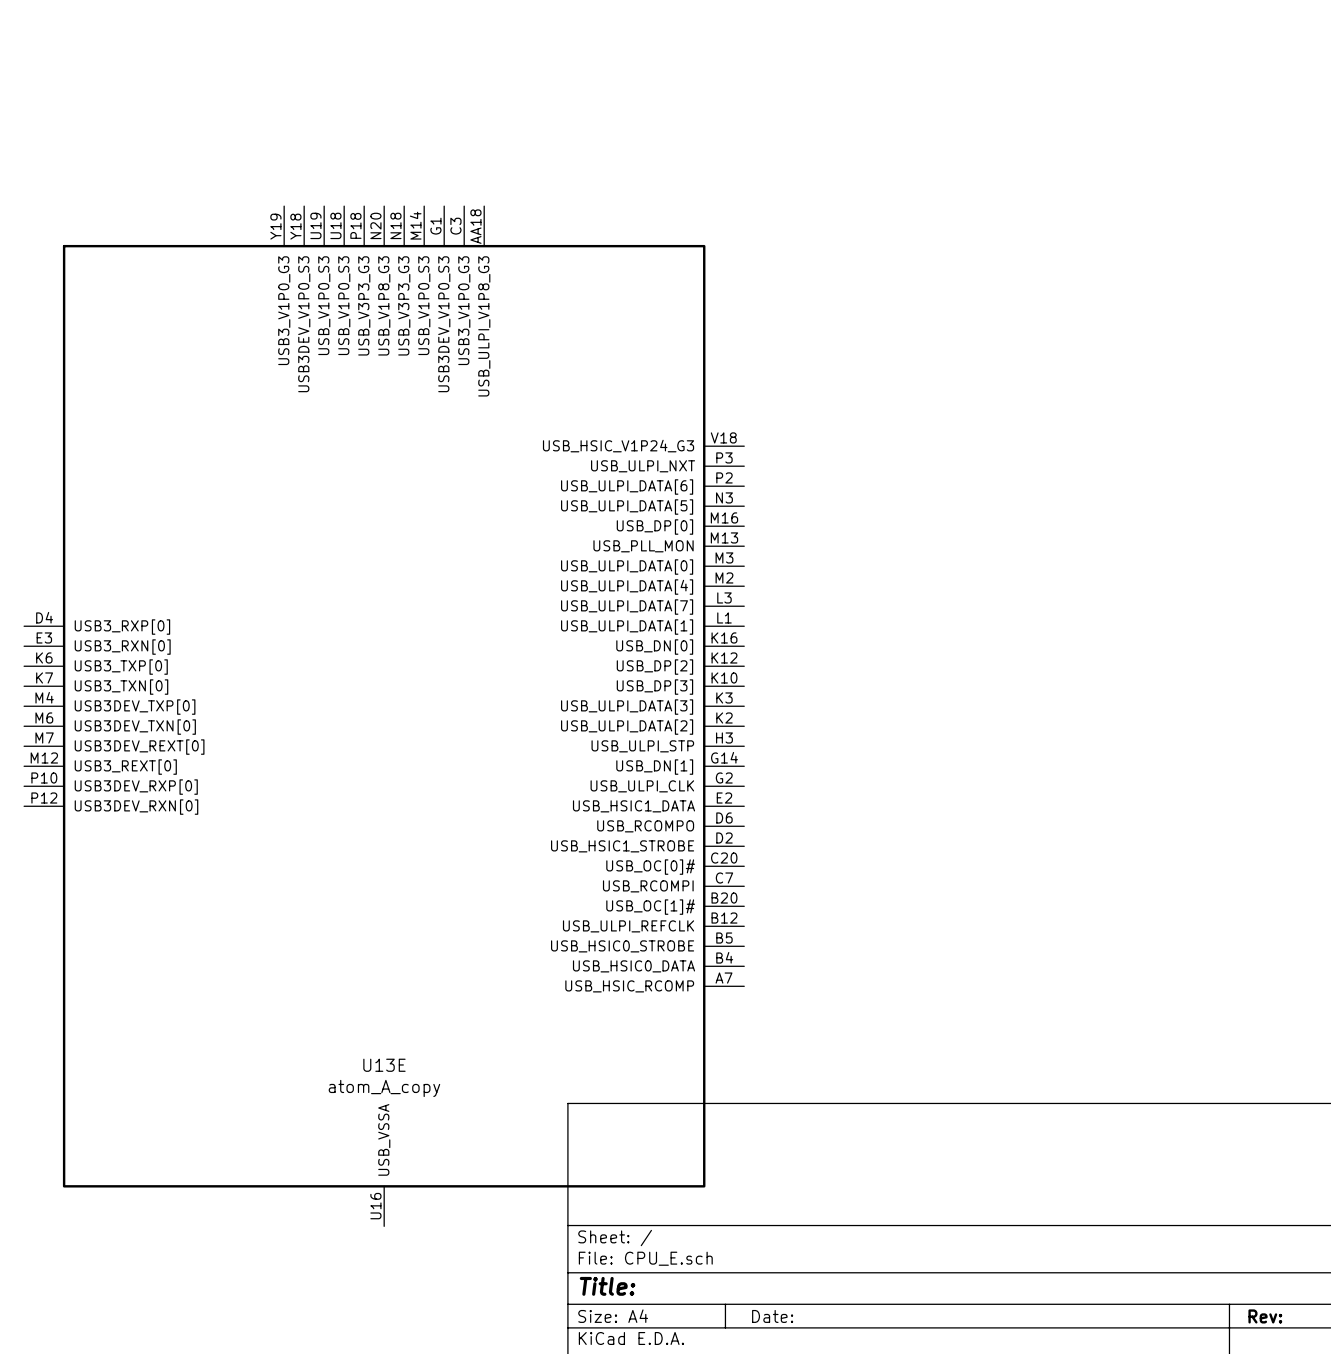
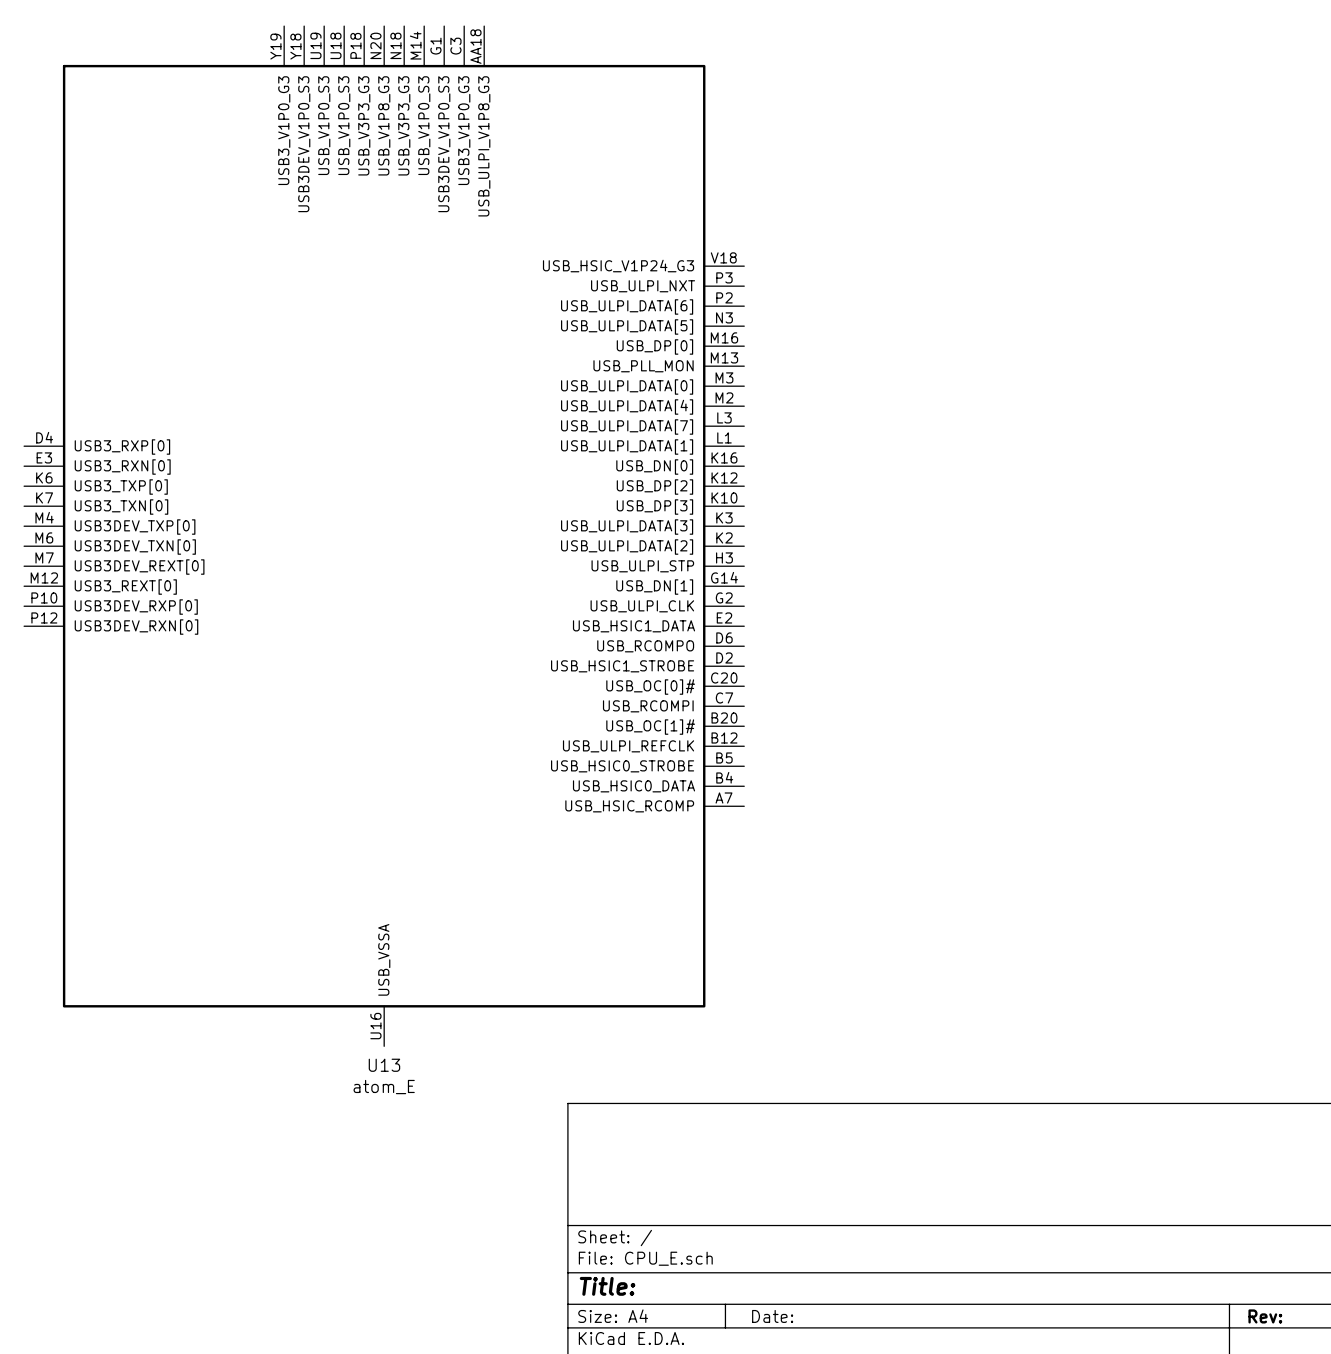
U13: none -> atom_E (384, 536)
U13E: atom_A_copy (384, 716) -> none

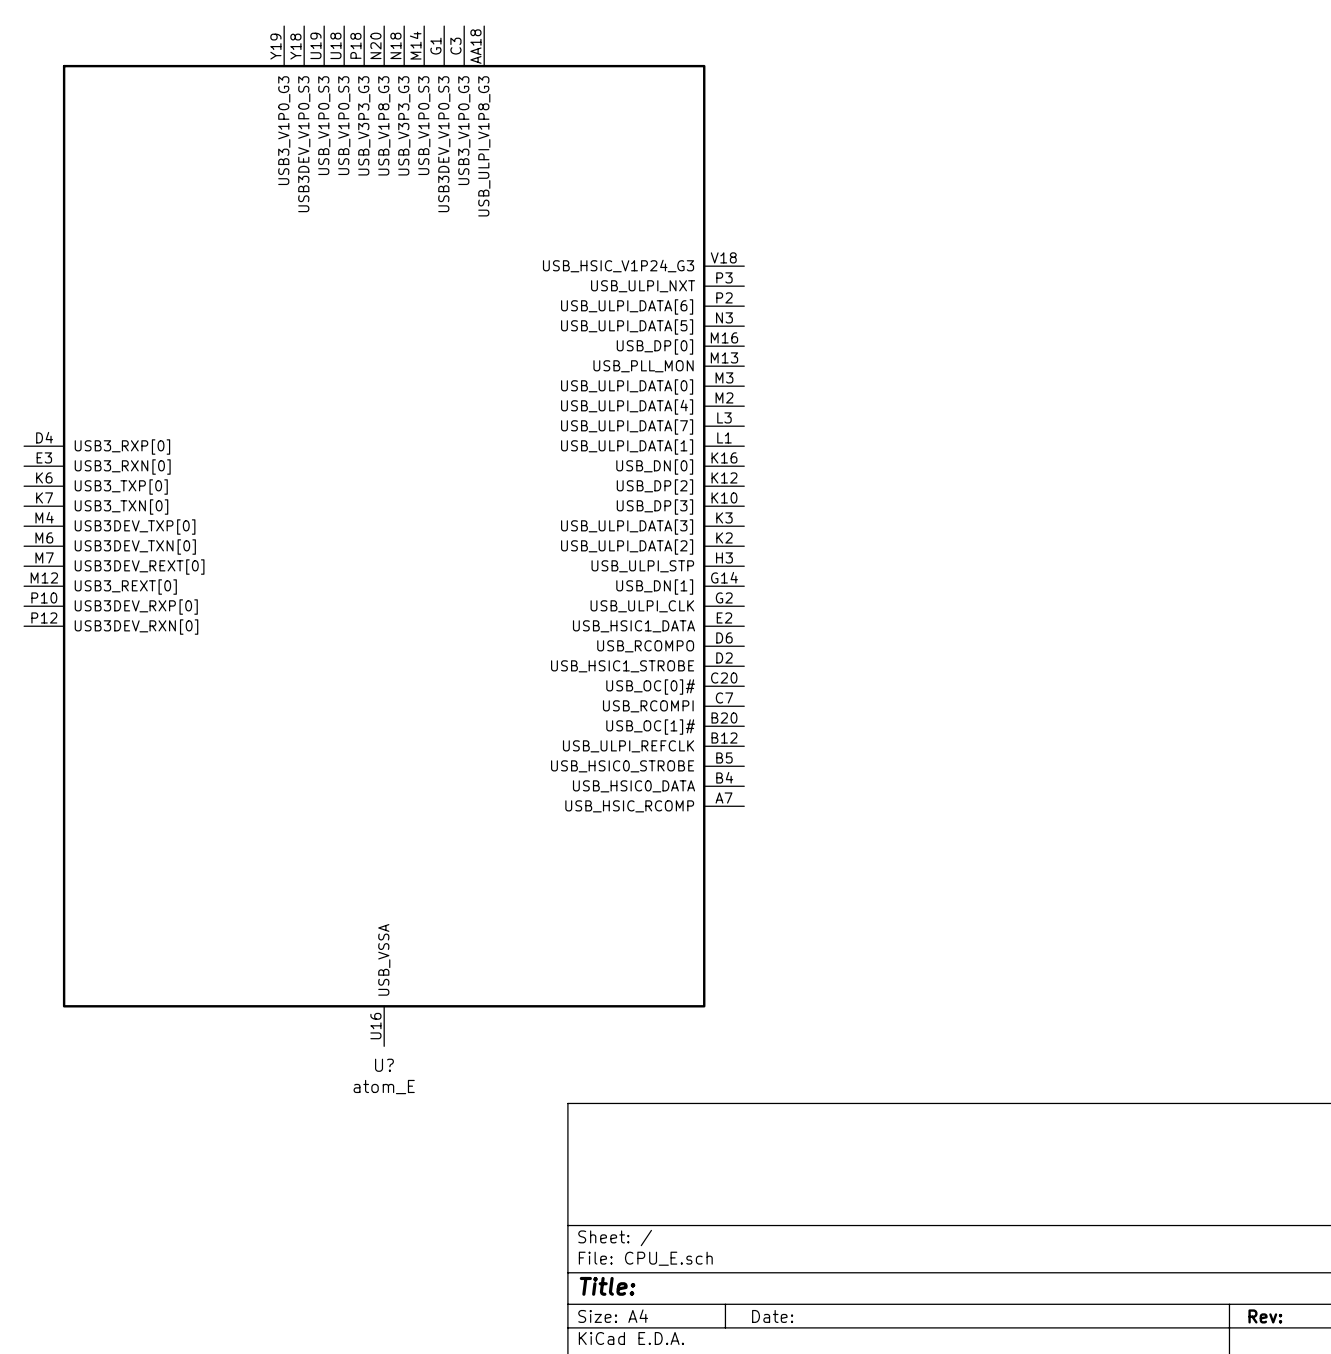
U13 name: U13 (384, 1065) -> U? (384, 1065)

